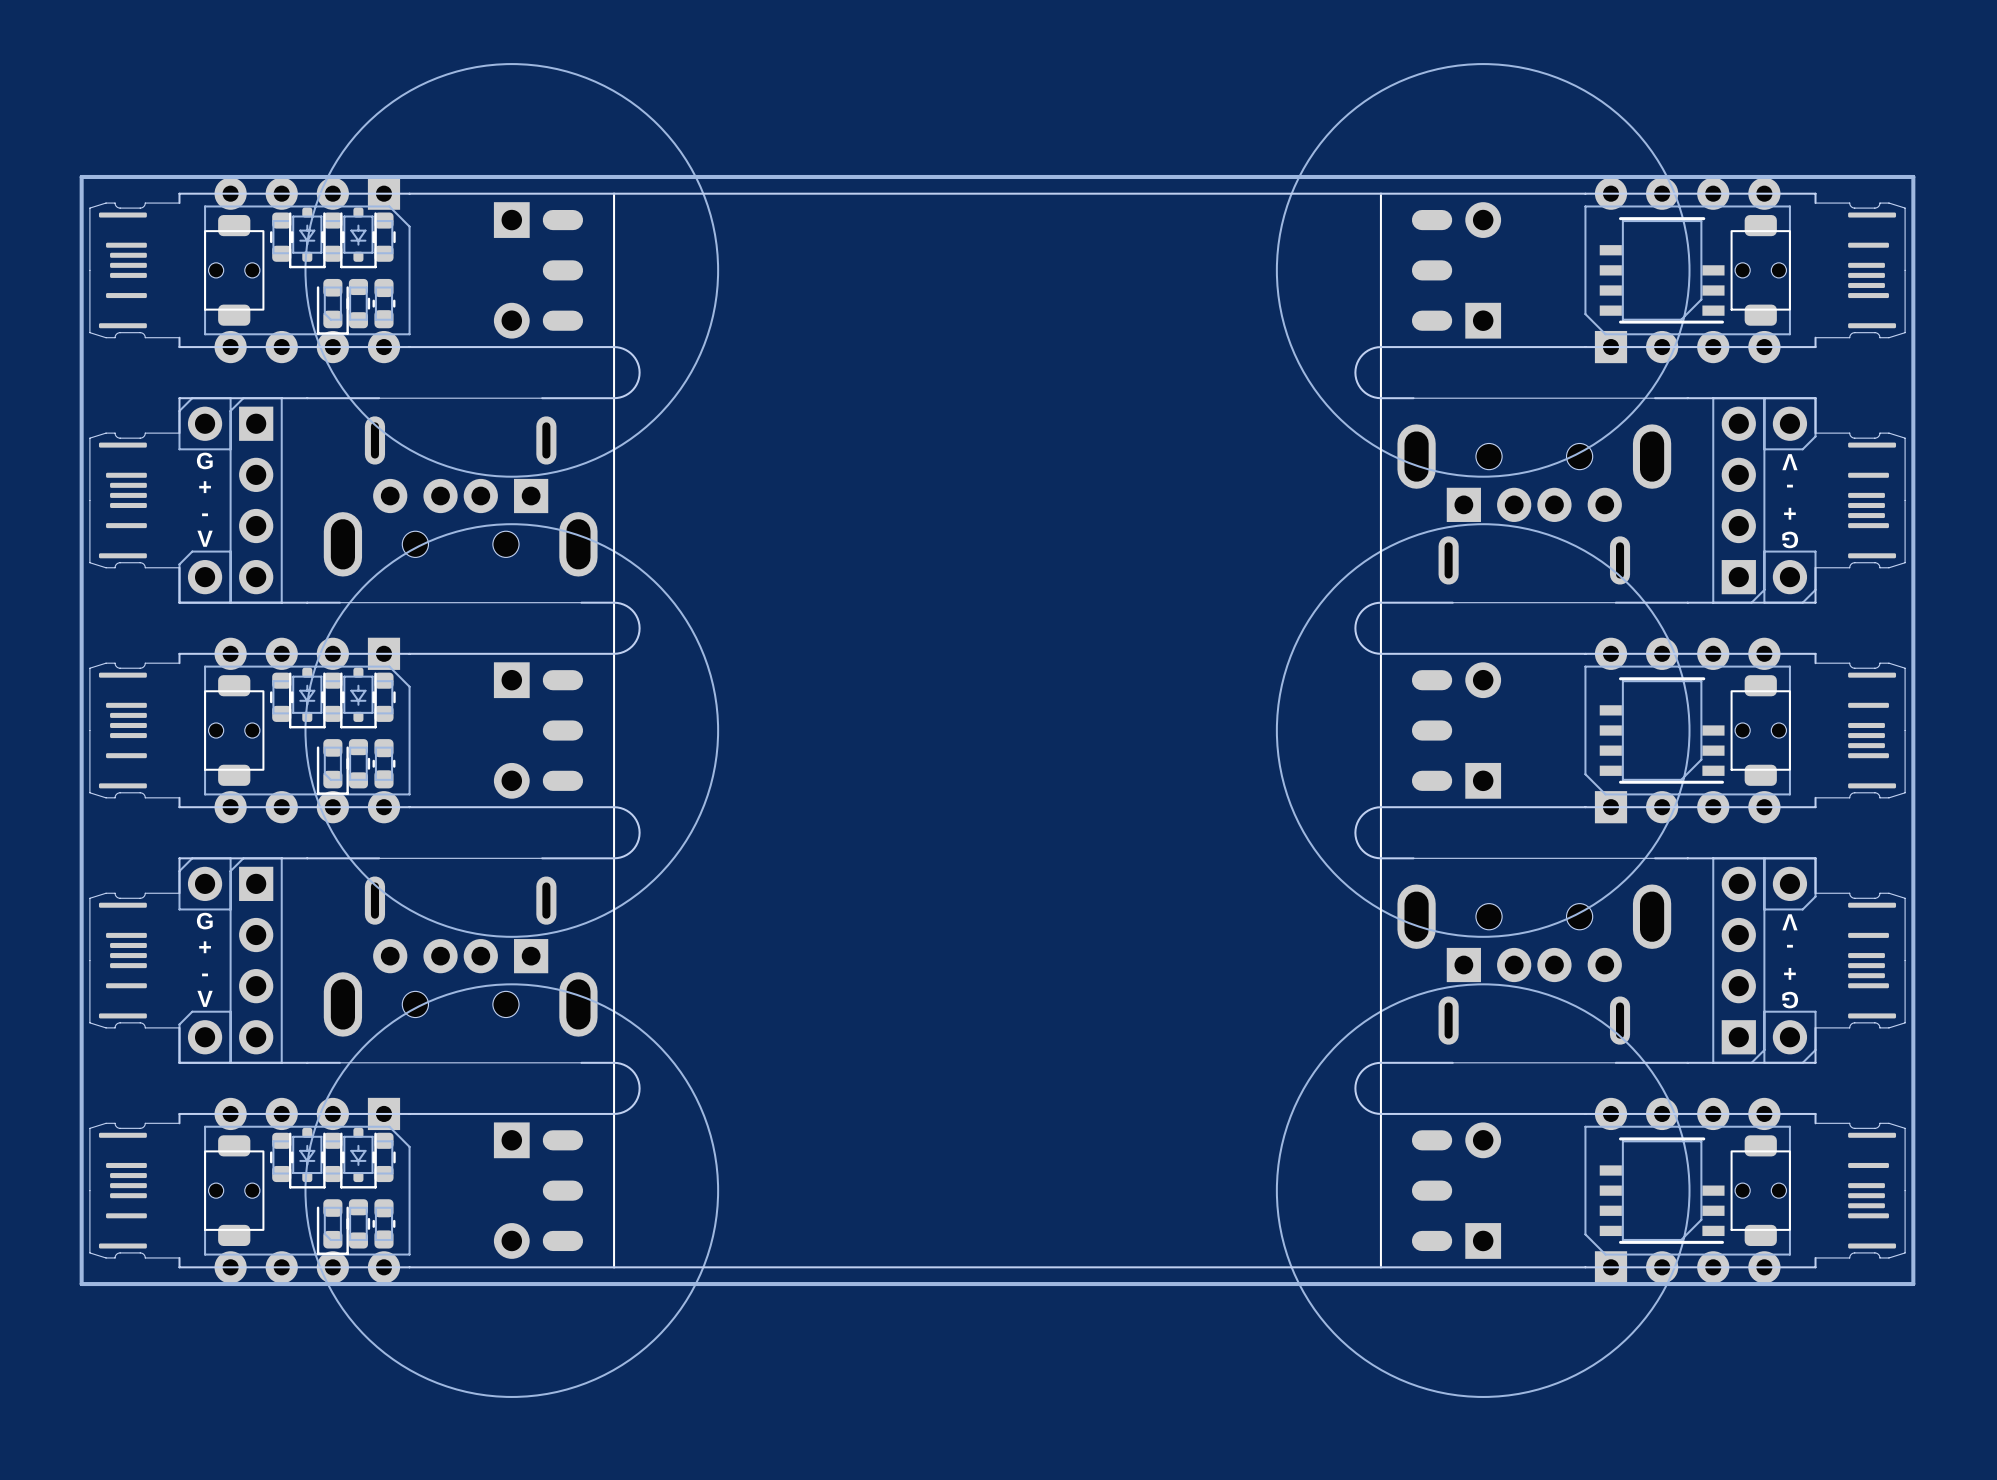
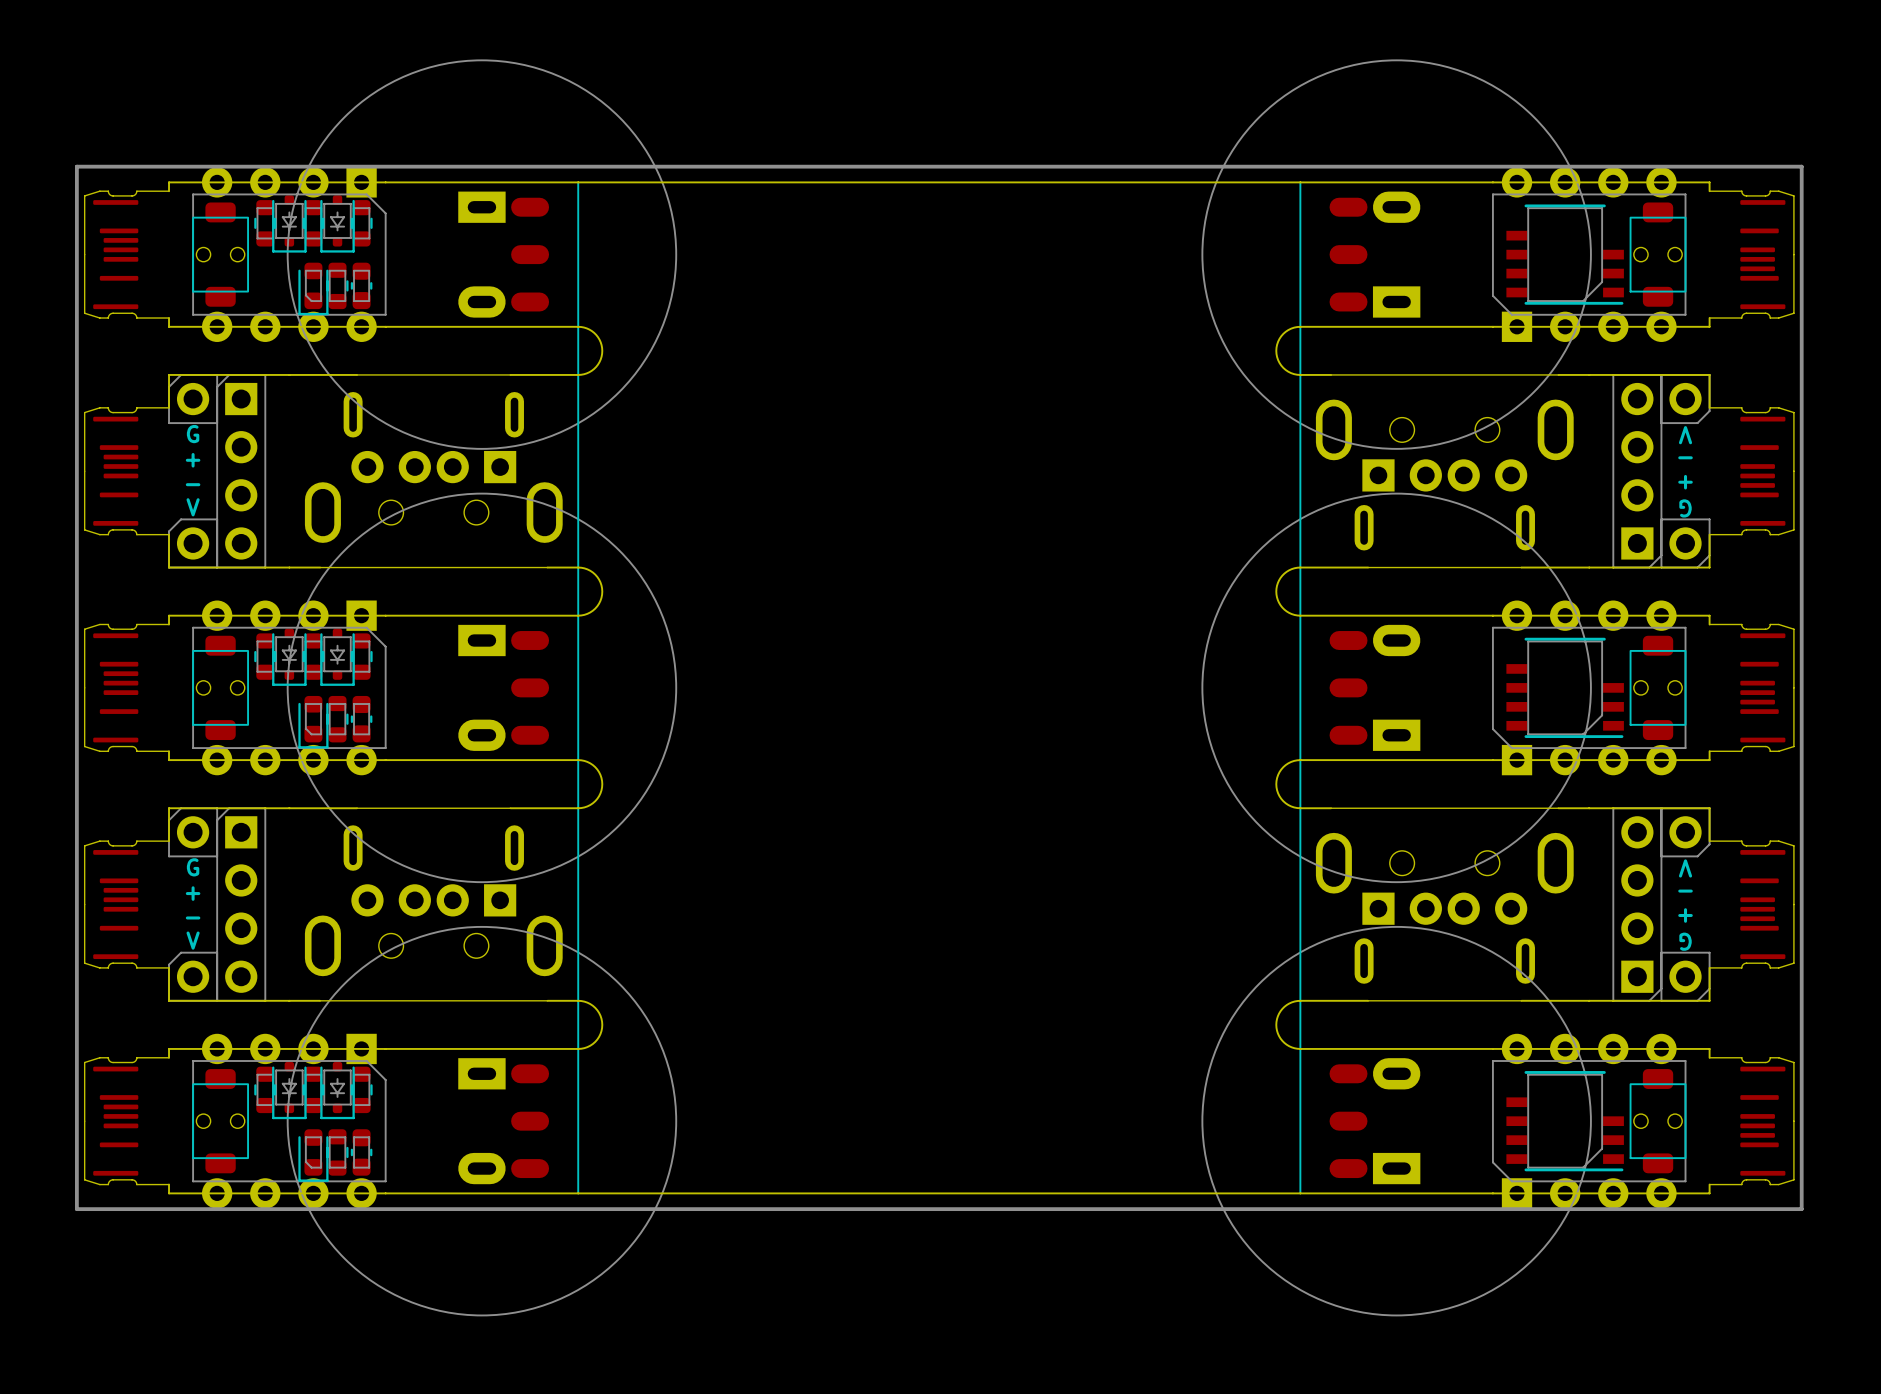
part footprint: [304, 63, 720, 478] -> [286, 59, 678, 450]
part footprint: [1275, 63, 1691, 478] -> [1201, 59, 1592, 450]
part footprint: [304, 523, 720, 938] -> [286, 492, 678, 884]
part footprint: [1275, 523, 1691, 938] -> [1201, 492, 1592, 884]
part footprint: [304, 983, 720, 1398] -> [286, 925, 678, 1317]
part footprint: [1275, 983, 1691, 1398] -> [1201, 925, 1592, 1317]

